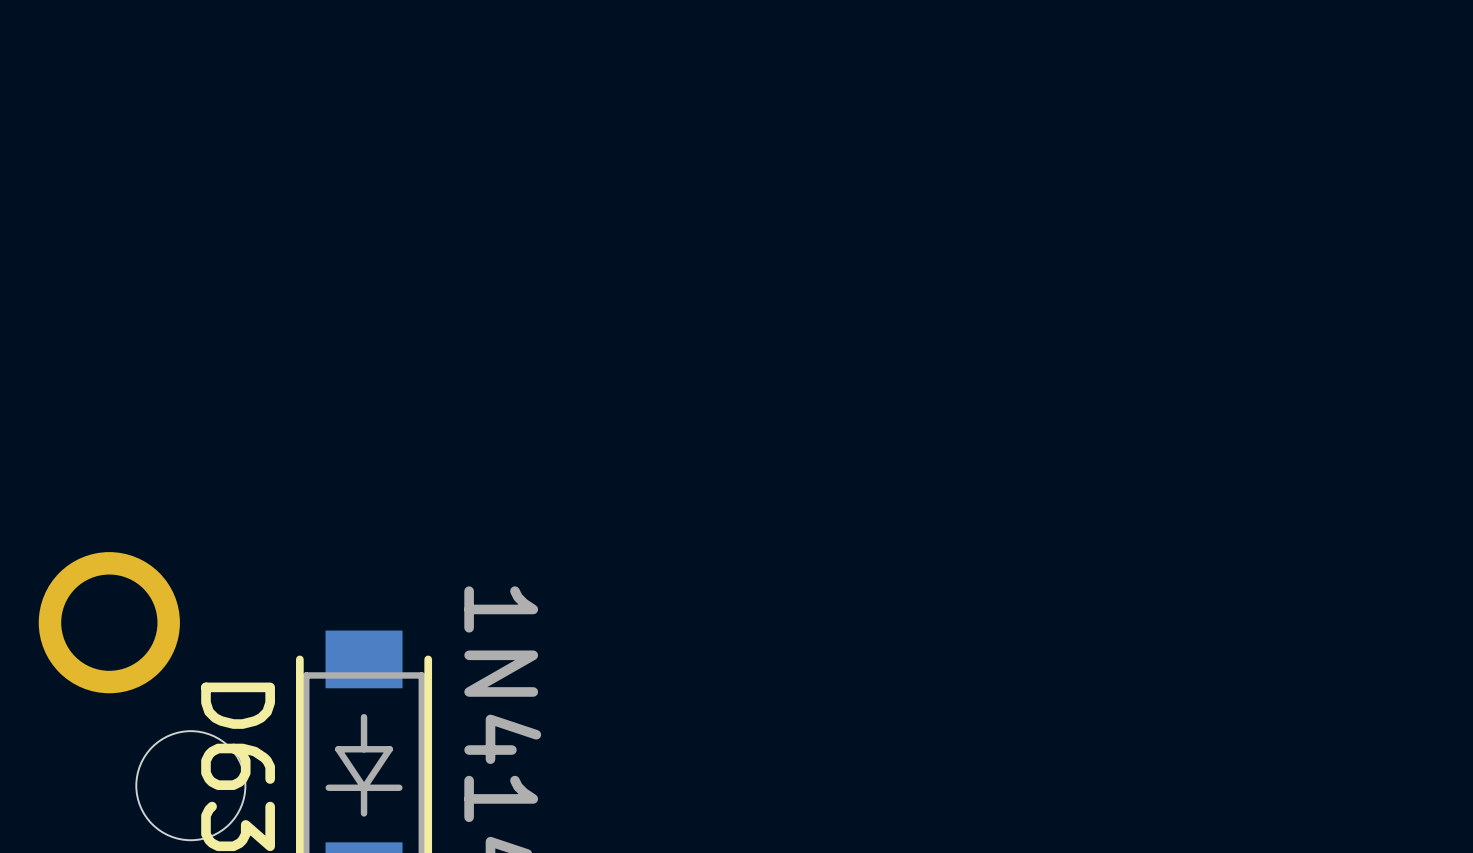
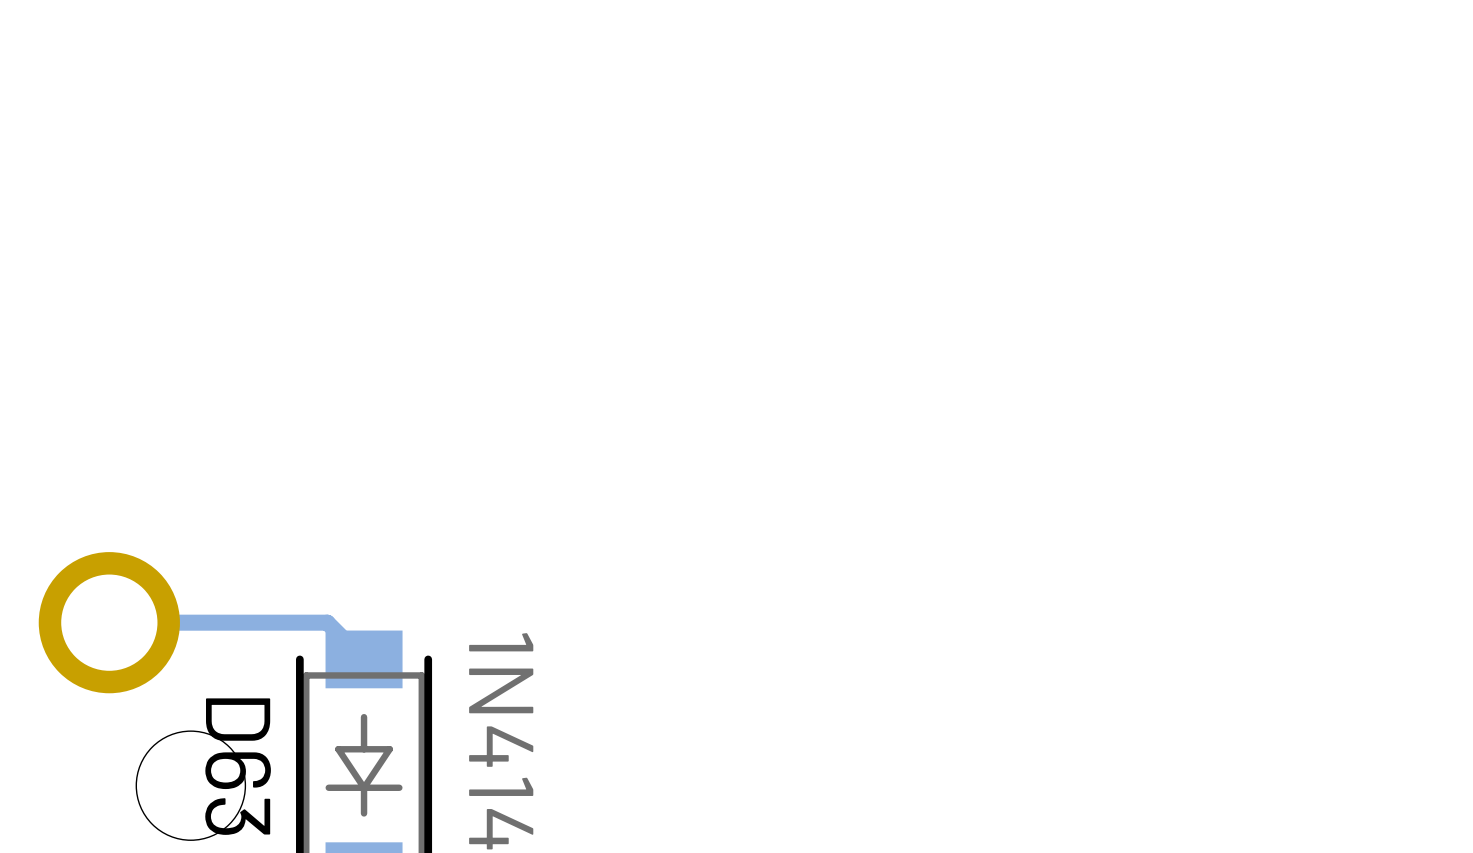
bottom track: none -> (109, 622) (327, 622) (364, 659)

